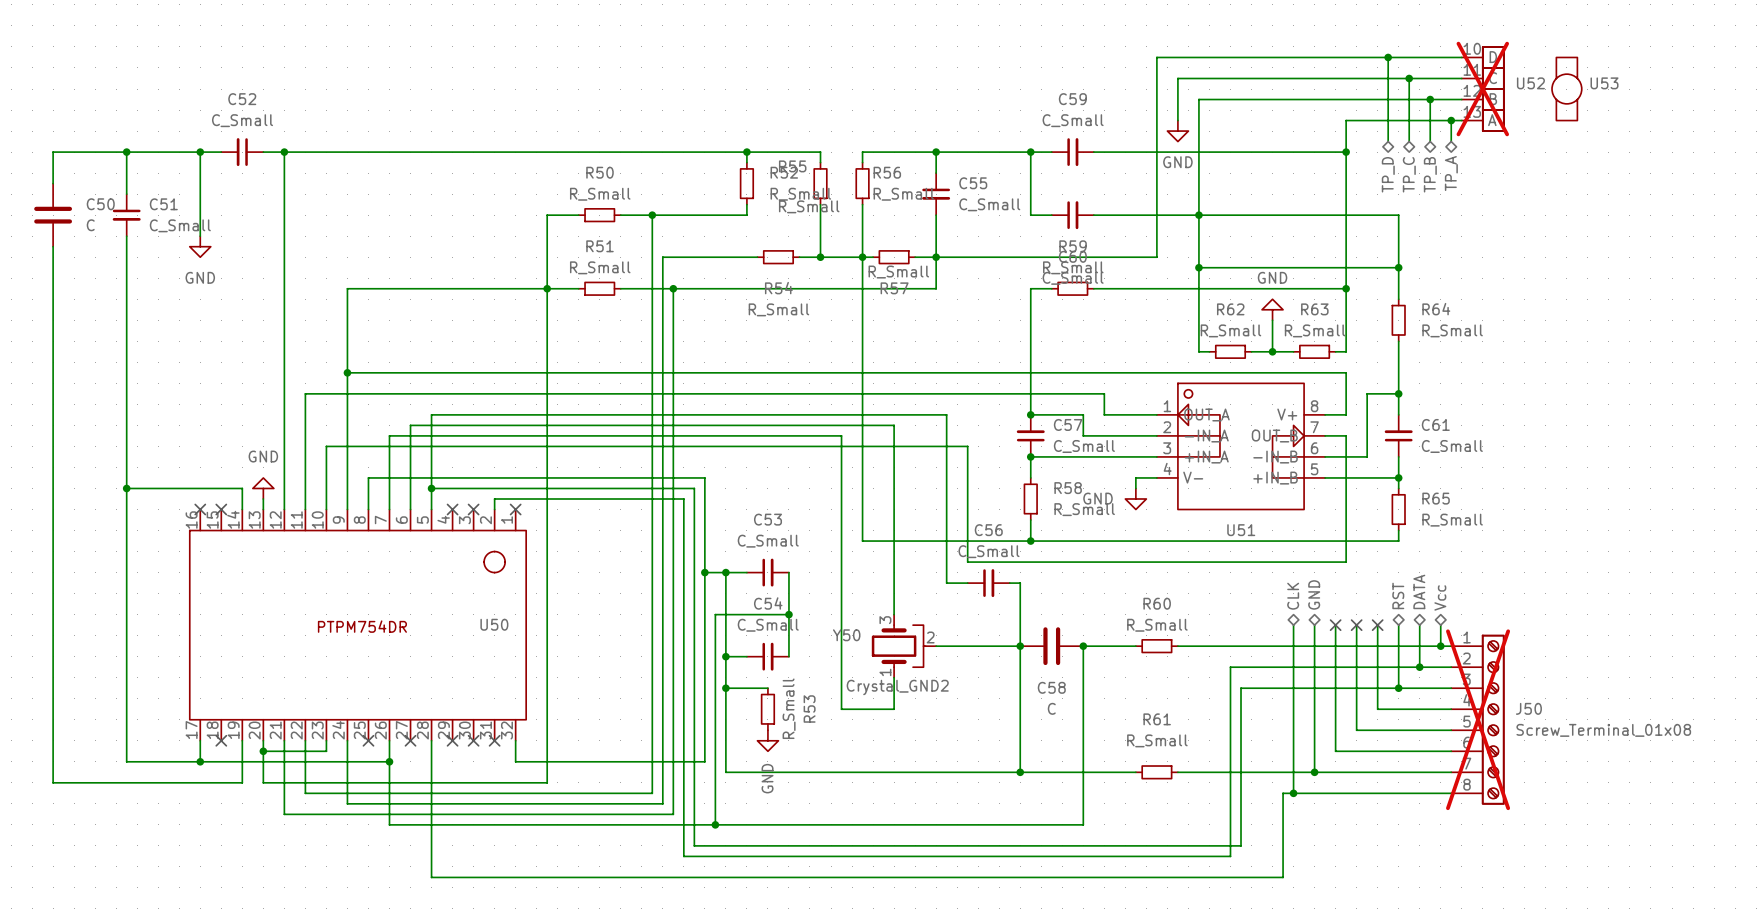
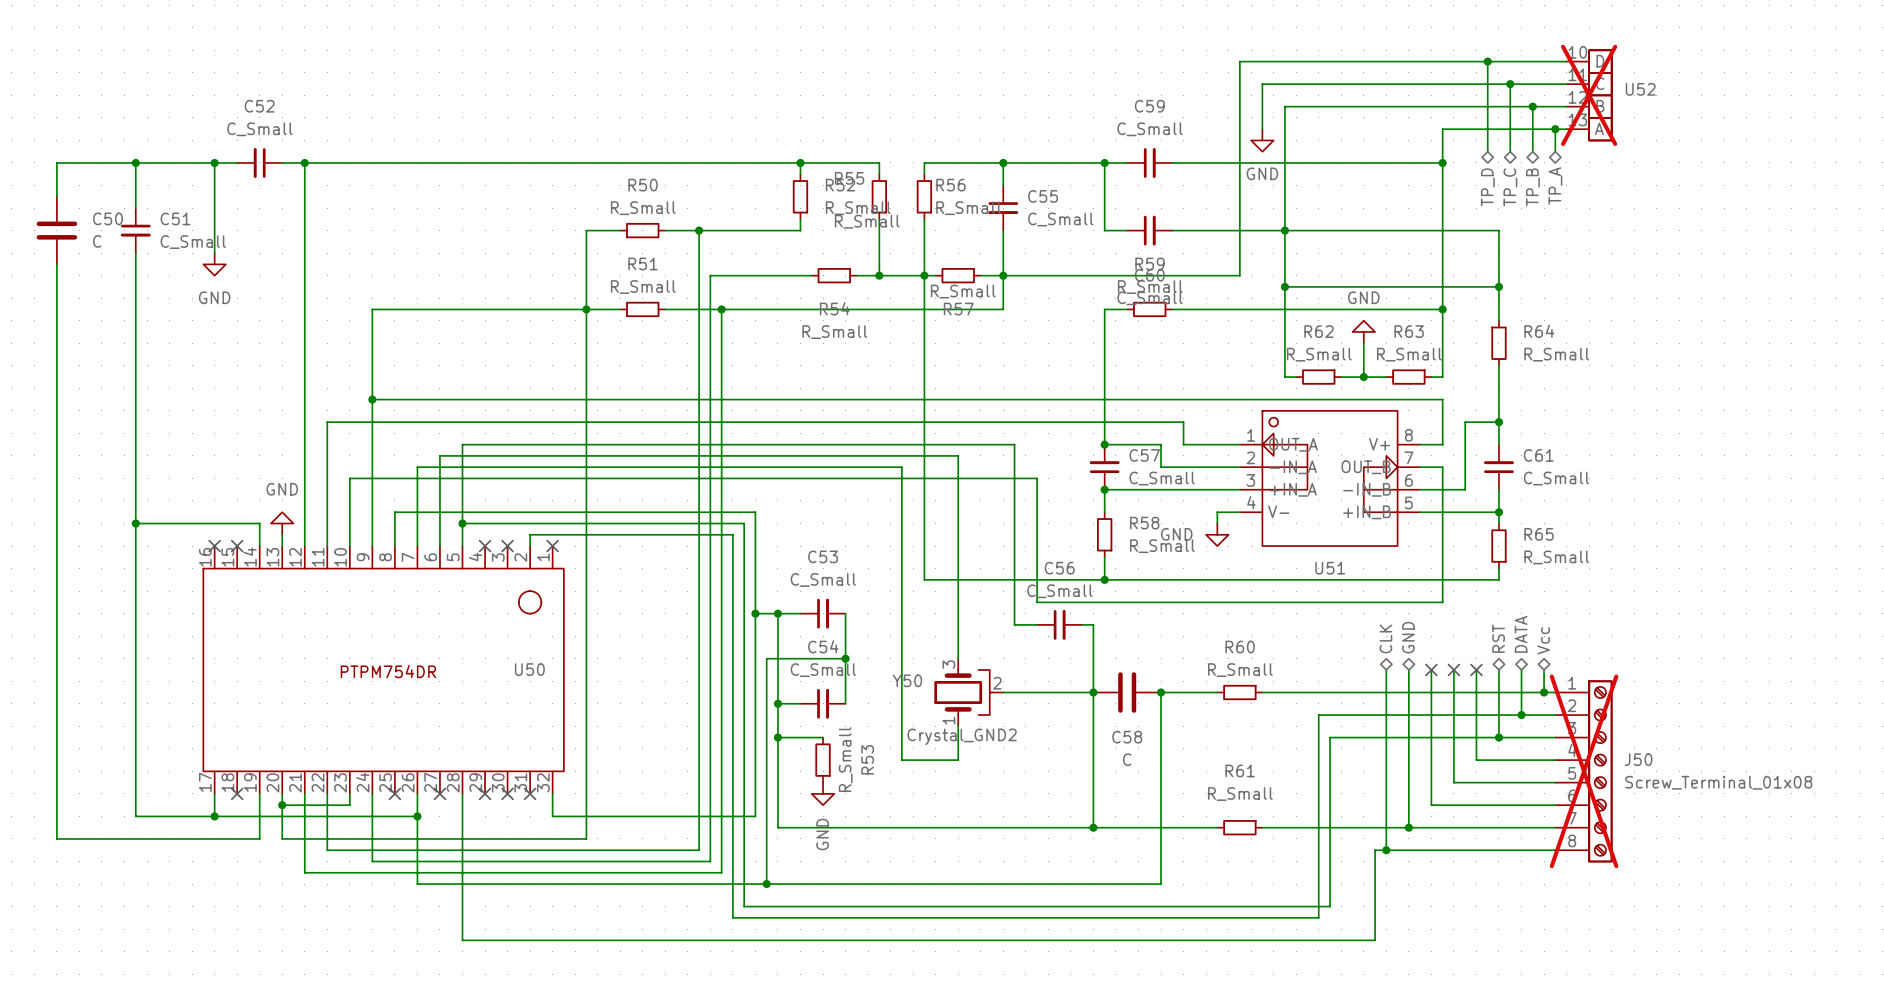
U53: (1566, 89) -> none

